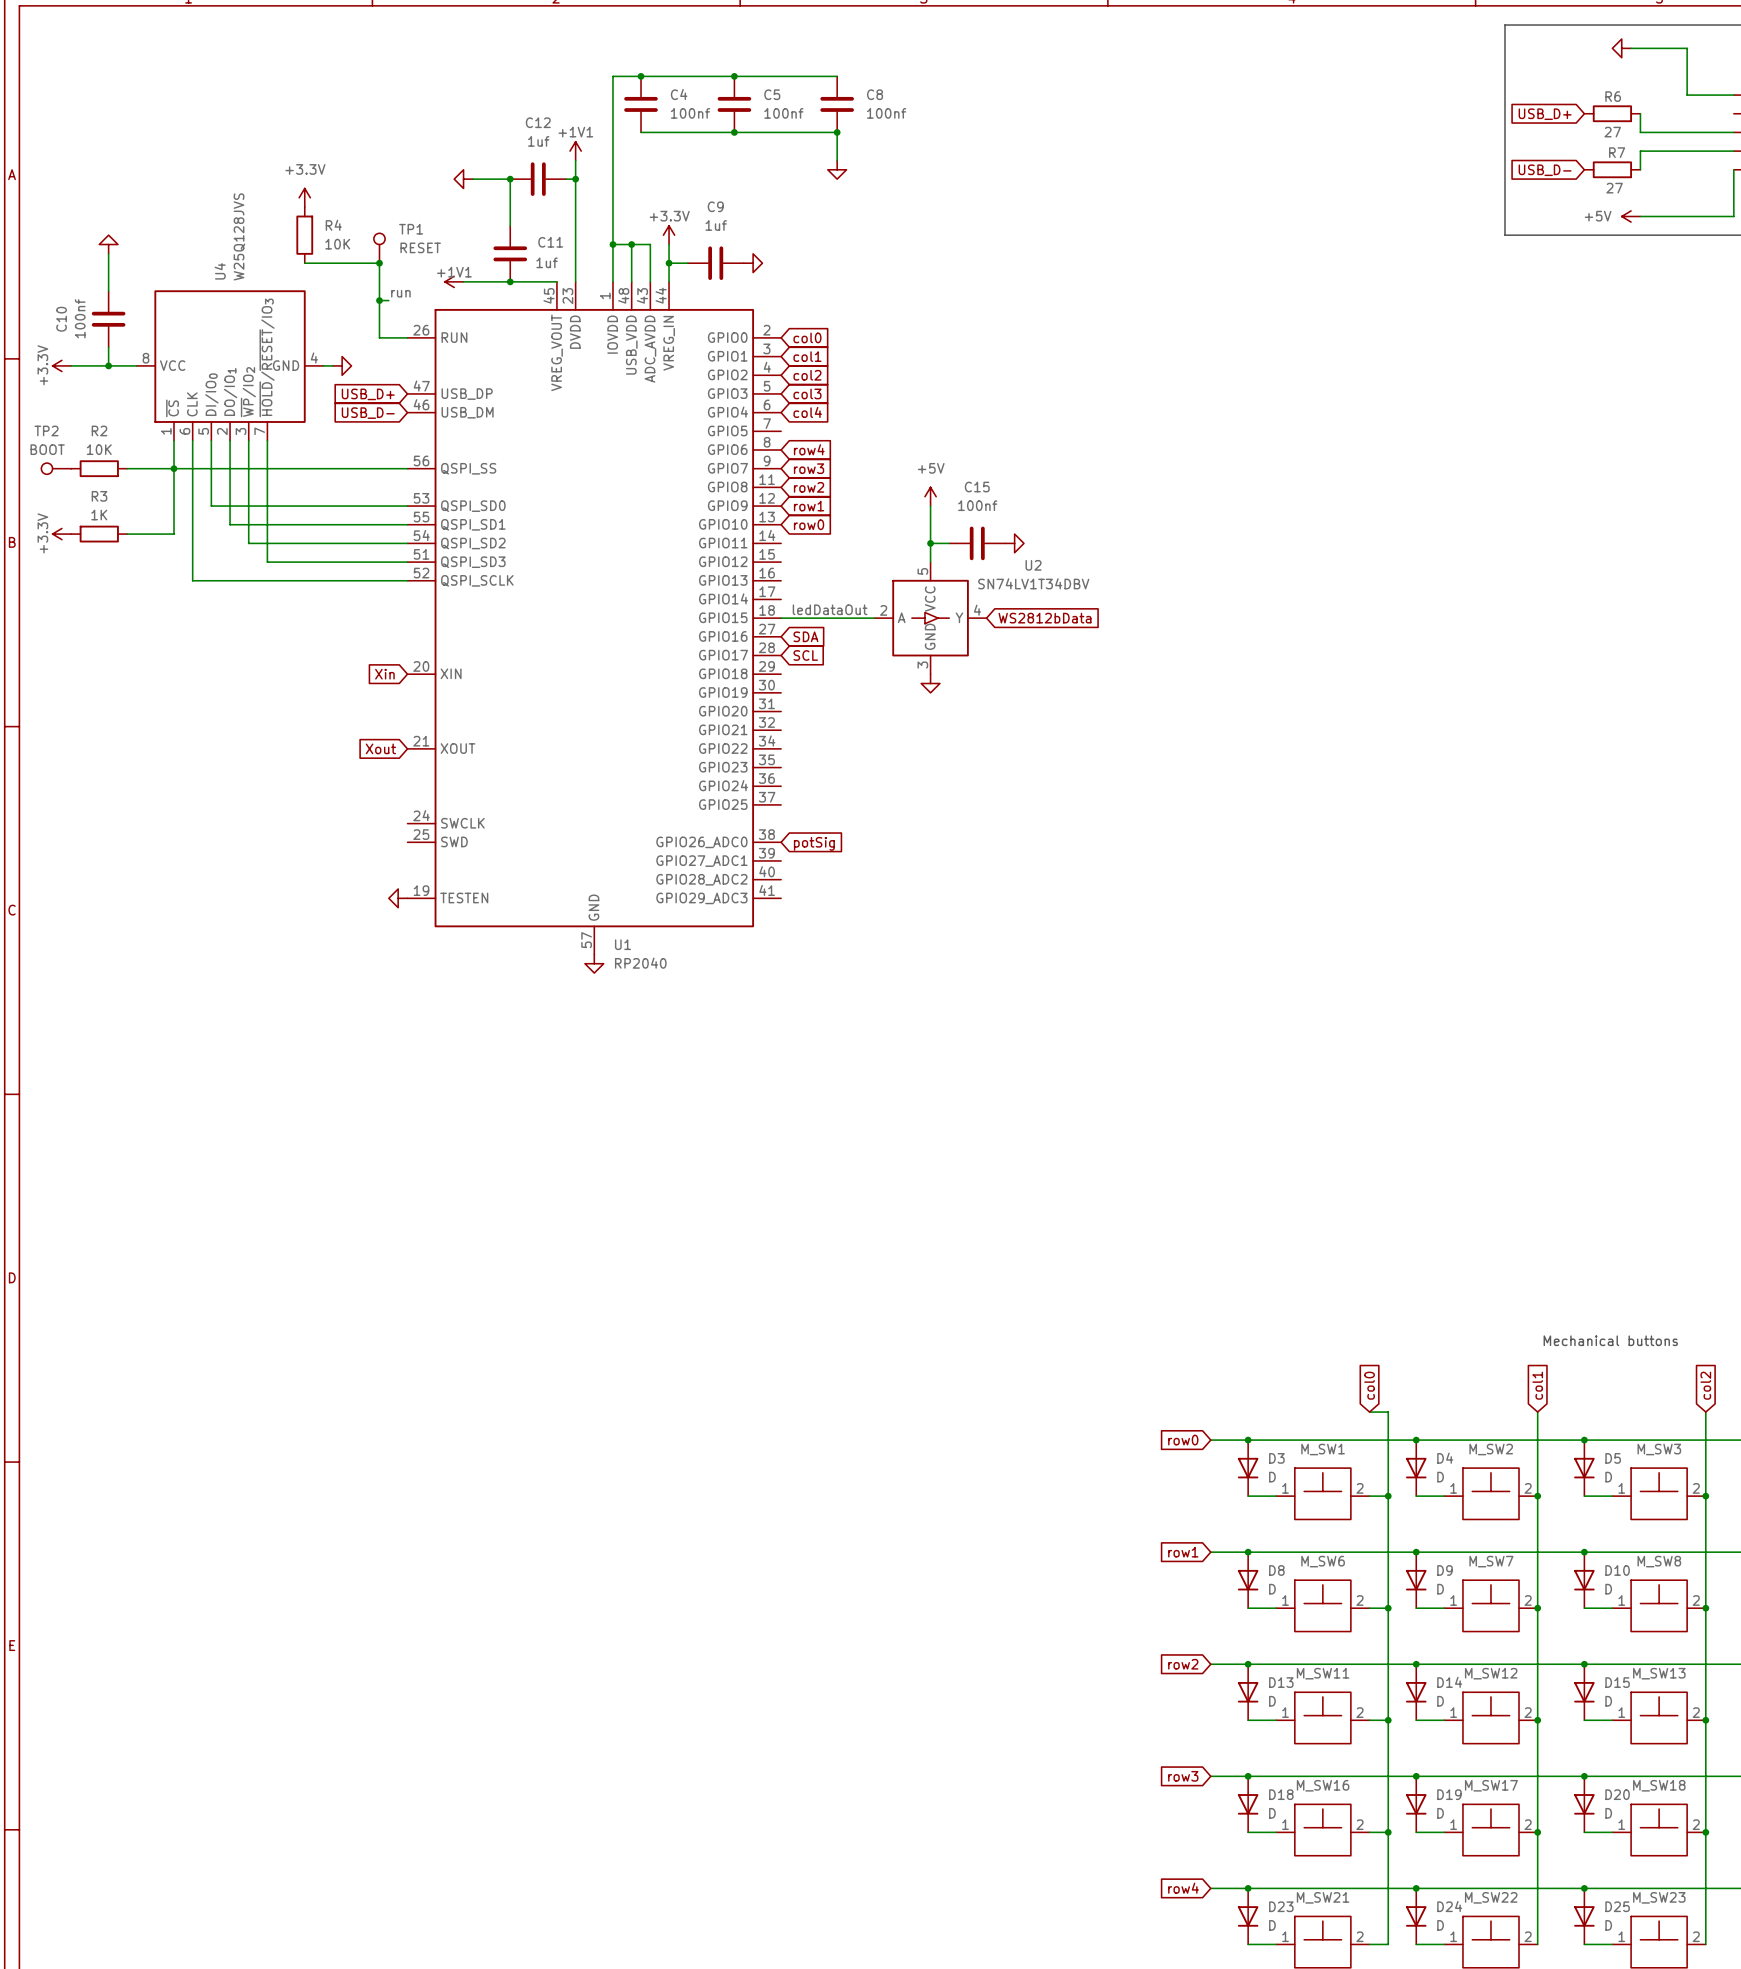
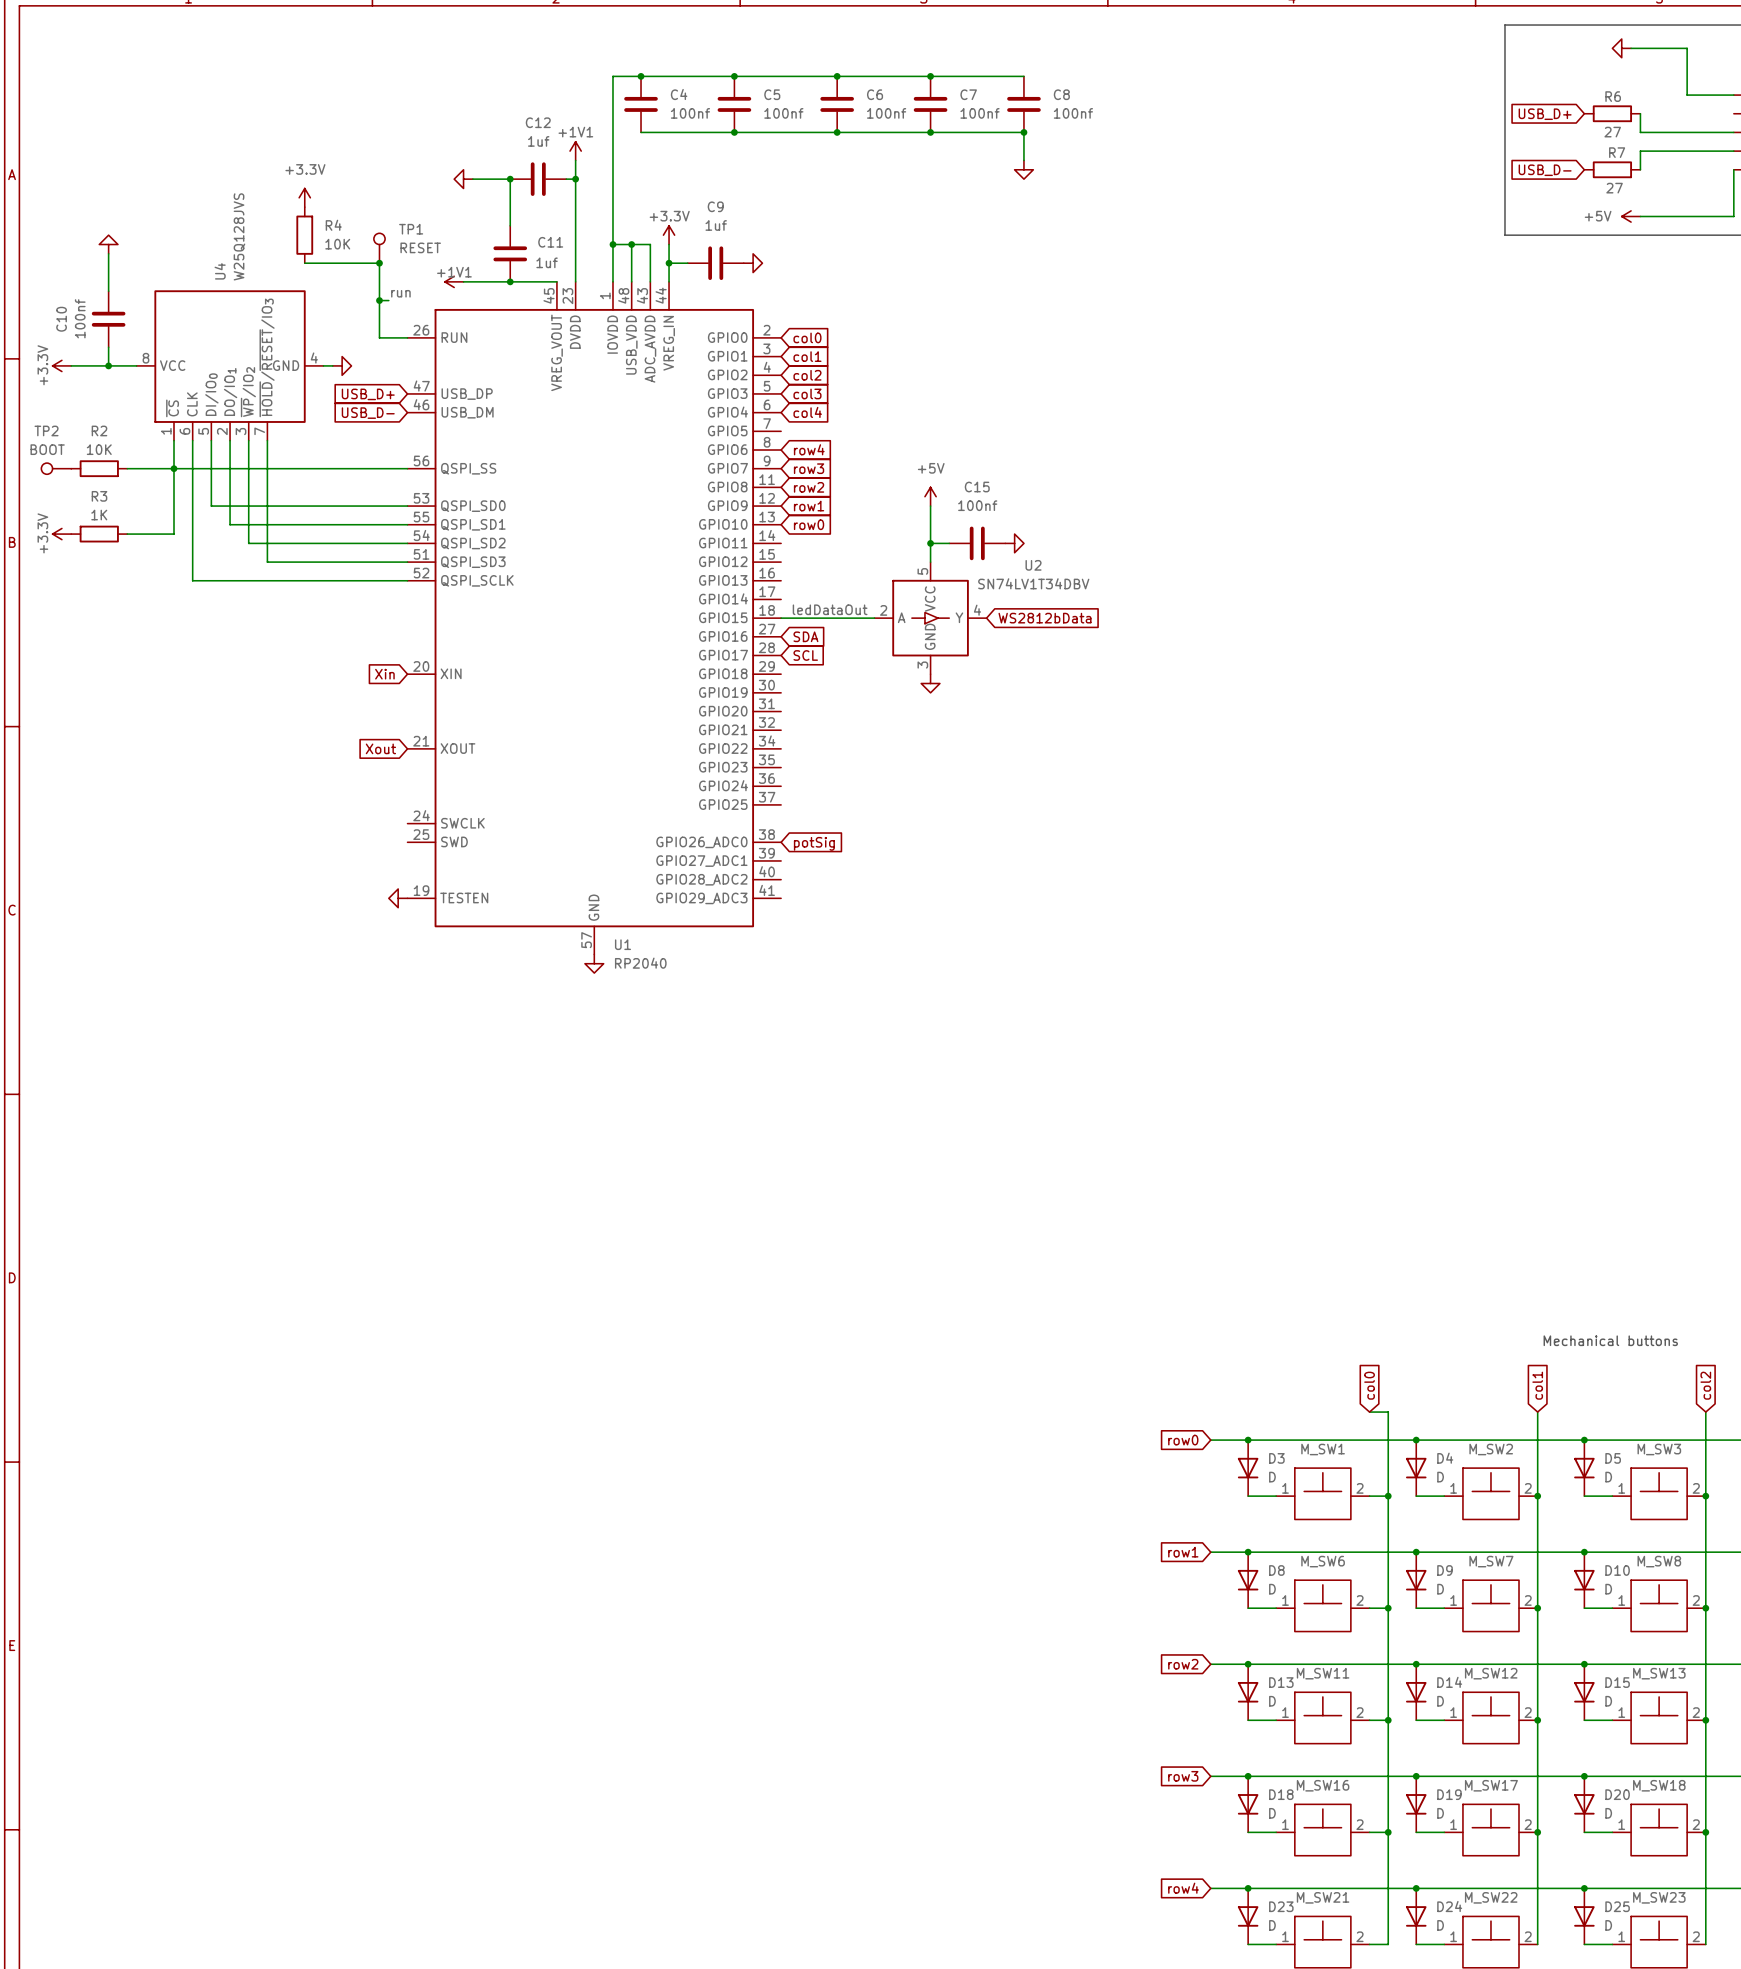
wire: none -> (837, 76) (1023, 76)
junction: none -> (837, 76)
junction: none -> (930, 76)
C8 name: C8 (875, 94) -> C6 (875, 94)
C7: none -> 100nf (930, 104)
C8: none -> 100nf (1023, 104)
wire: (837, 132) (837, 160) -> (837, 132) (1023, 132) (1023, 160)
junction: none -> (930, 132)
junction: none -> (1023, 132)
power symbol: (837, 169) -> none
power symbol: none -> (1023, 169)

